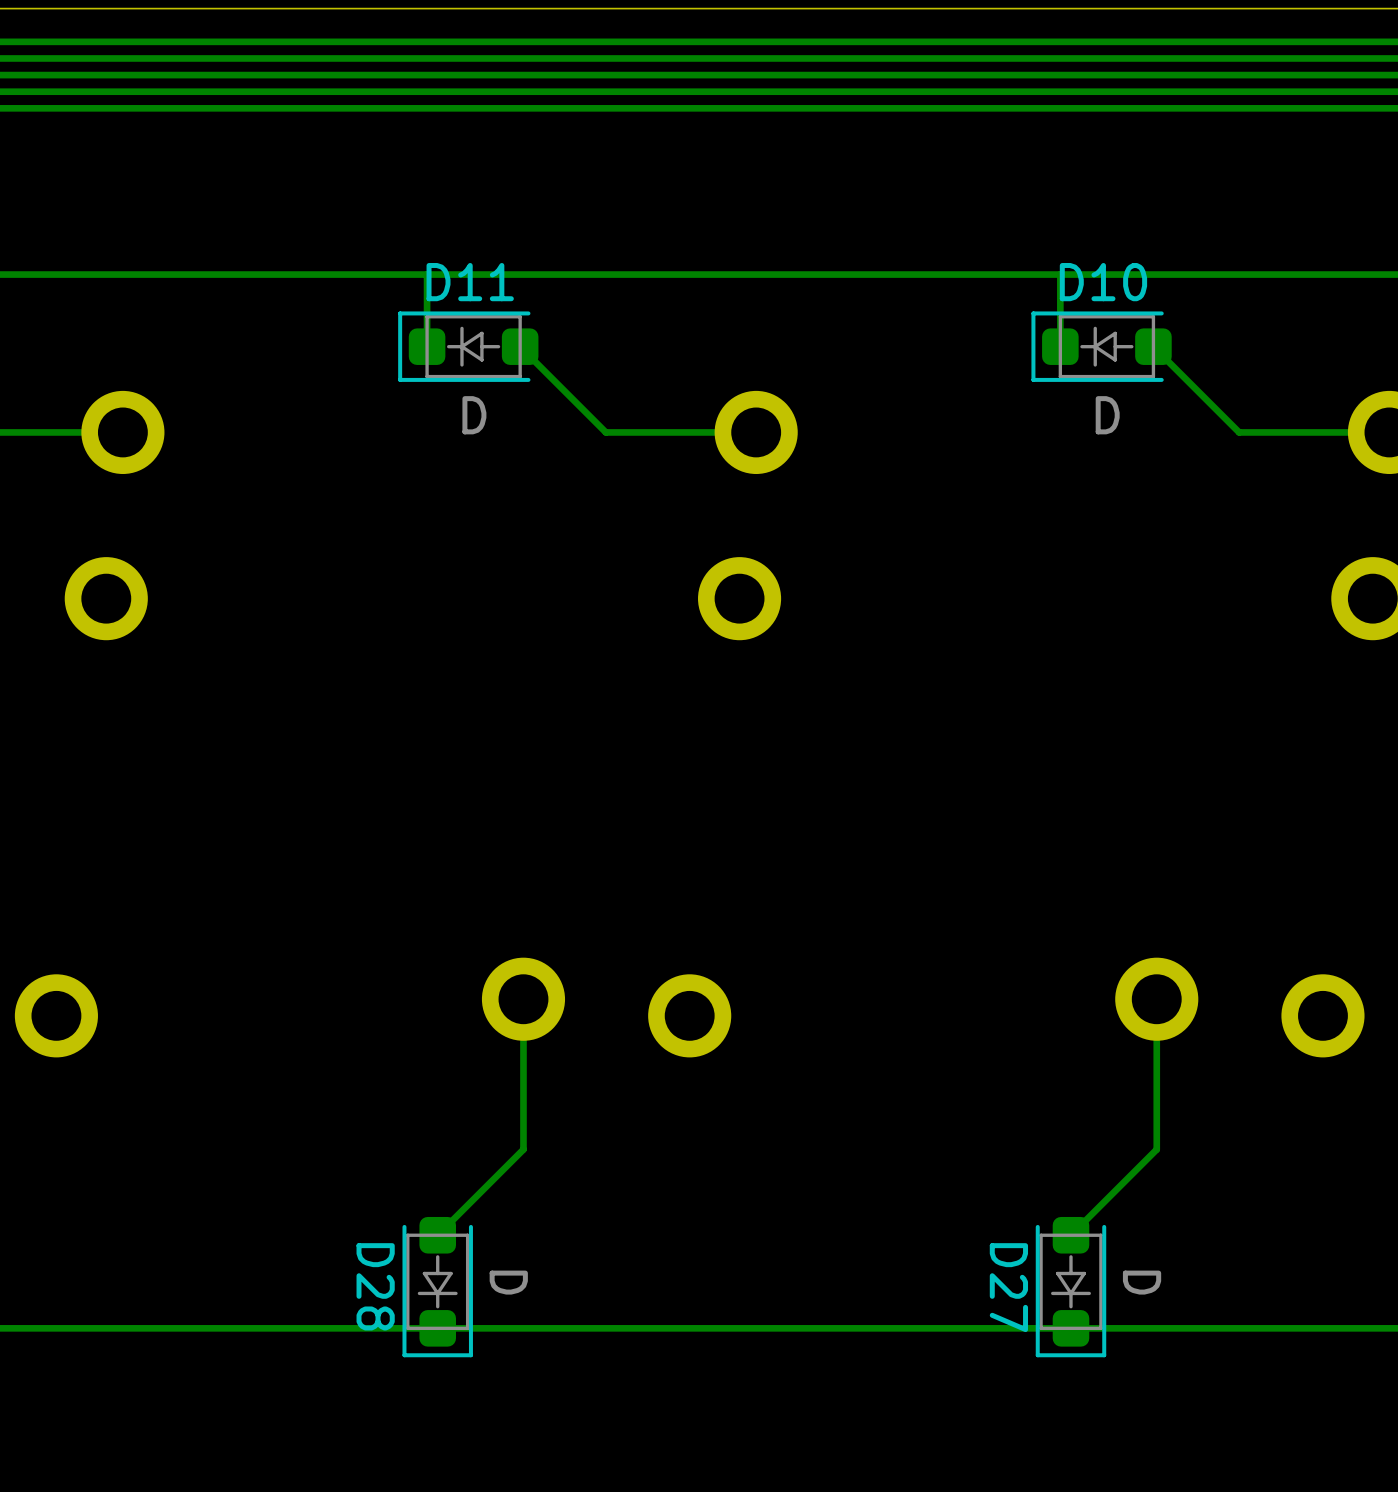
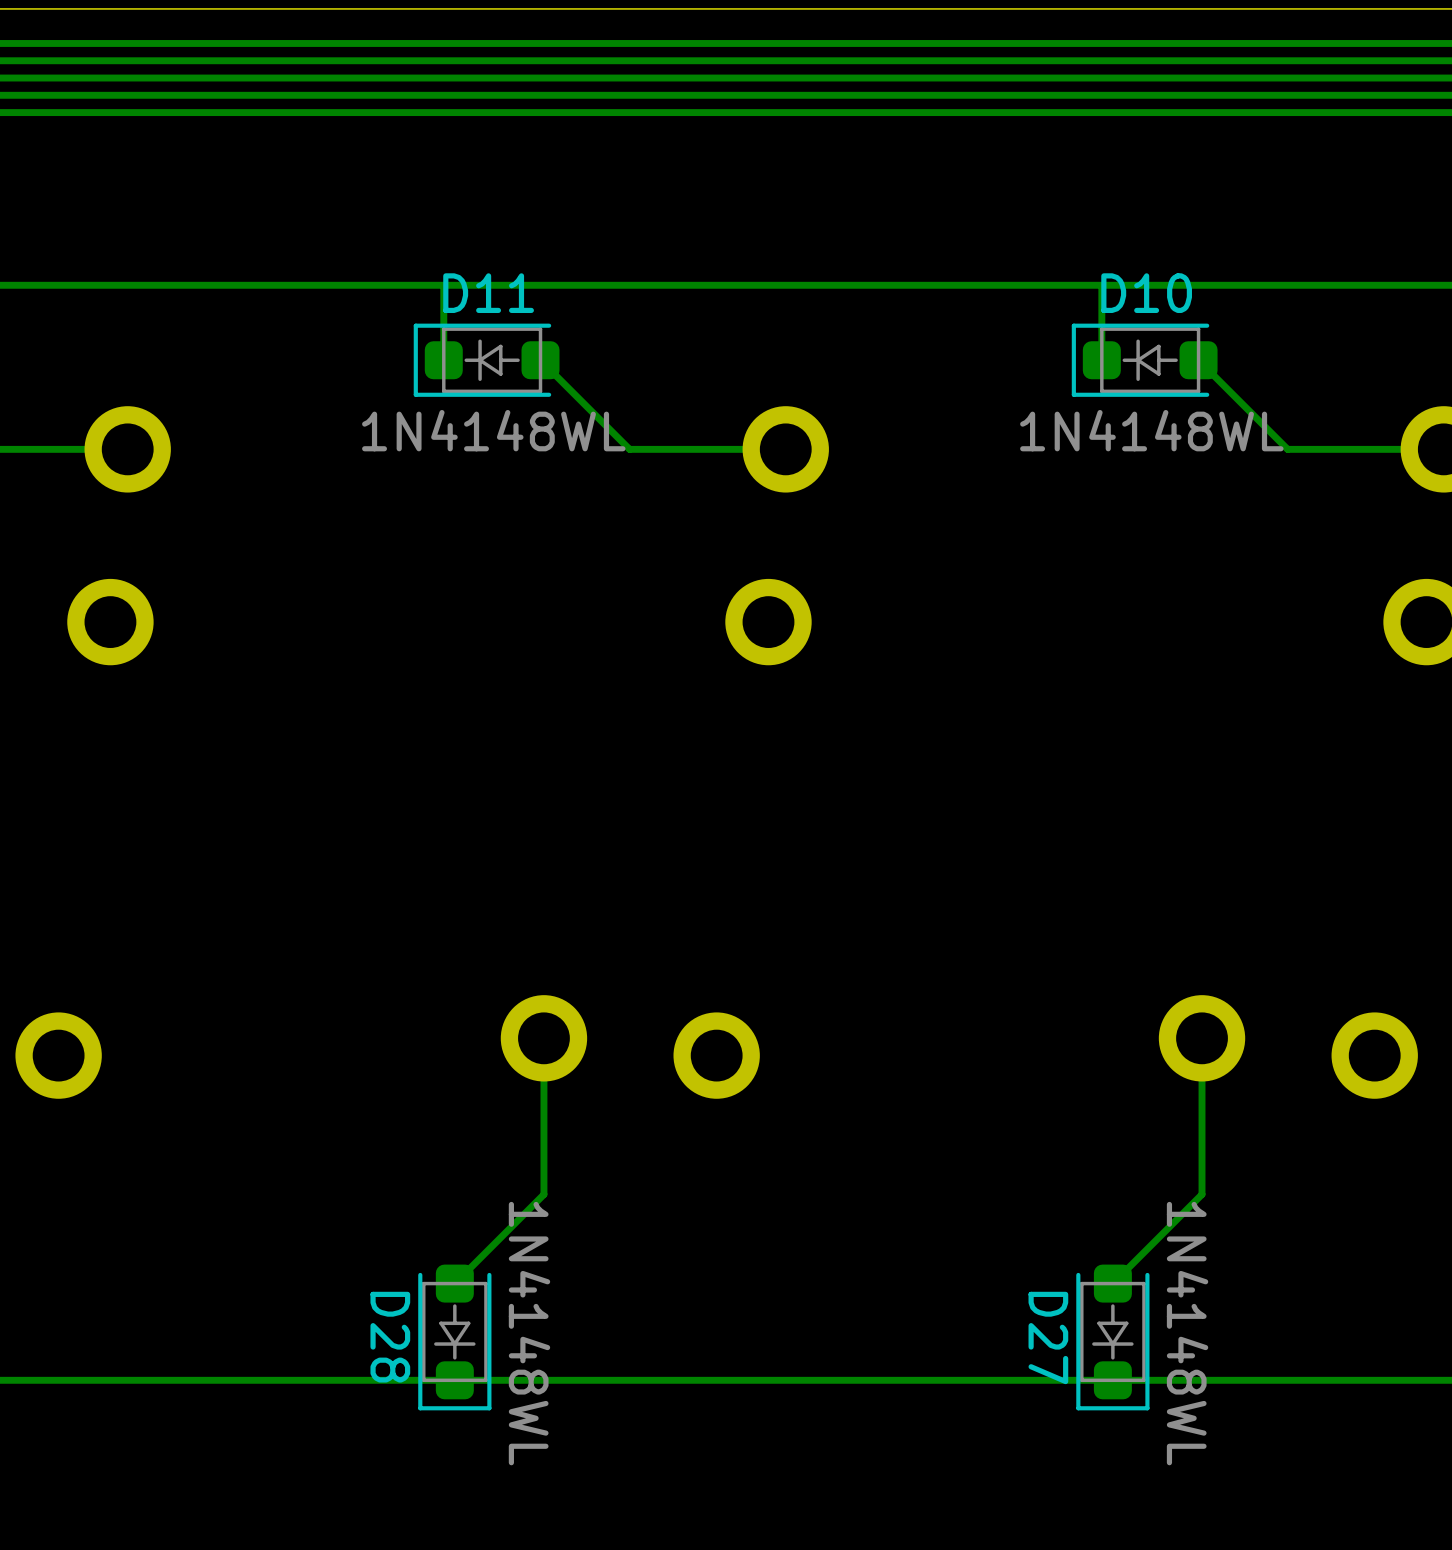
D11 value: D (474, 415) -> 1N4148WL (493, 430)
D10 value: D (1107, 415) -> 1N4148WL (1151, 430)
D28 value: D (508, 1282) -> 1N4148WL (529, 1333)
D27 value: D (1142, 1282) -> 1N4148WL (1187, 1333)

